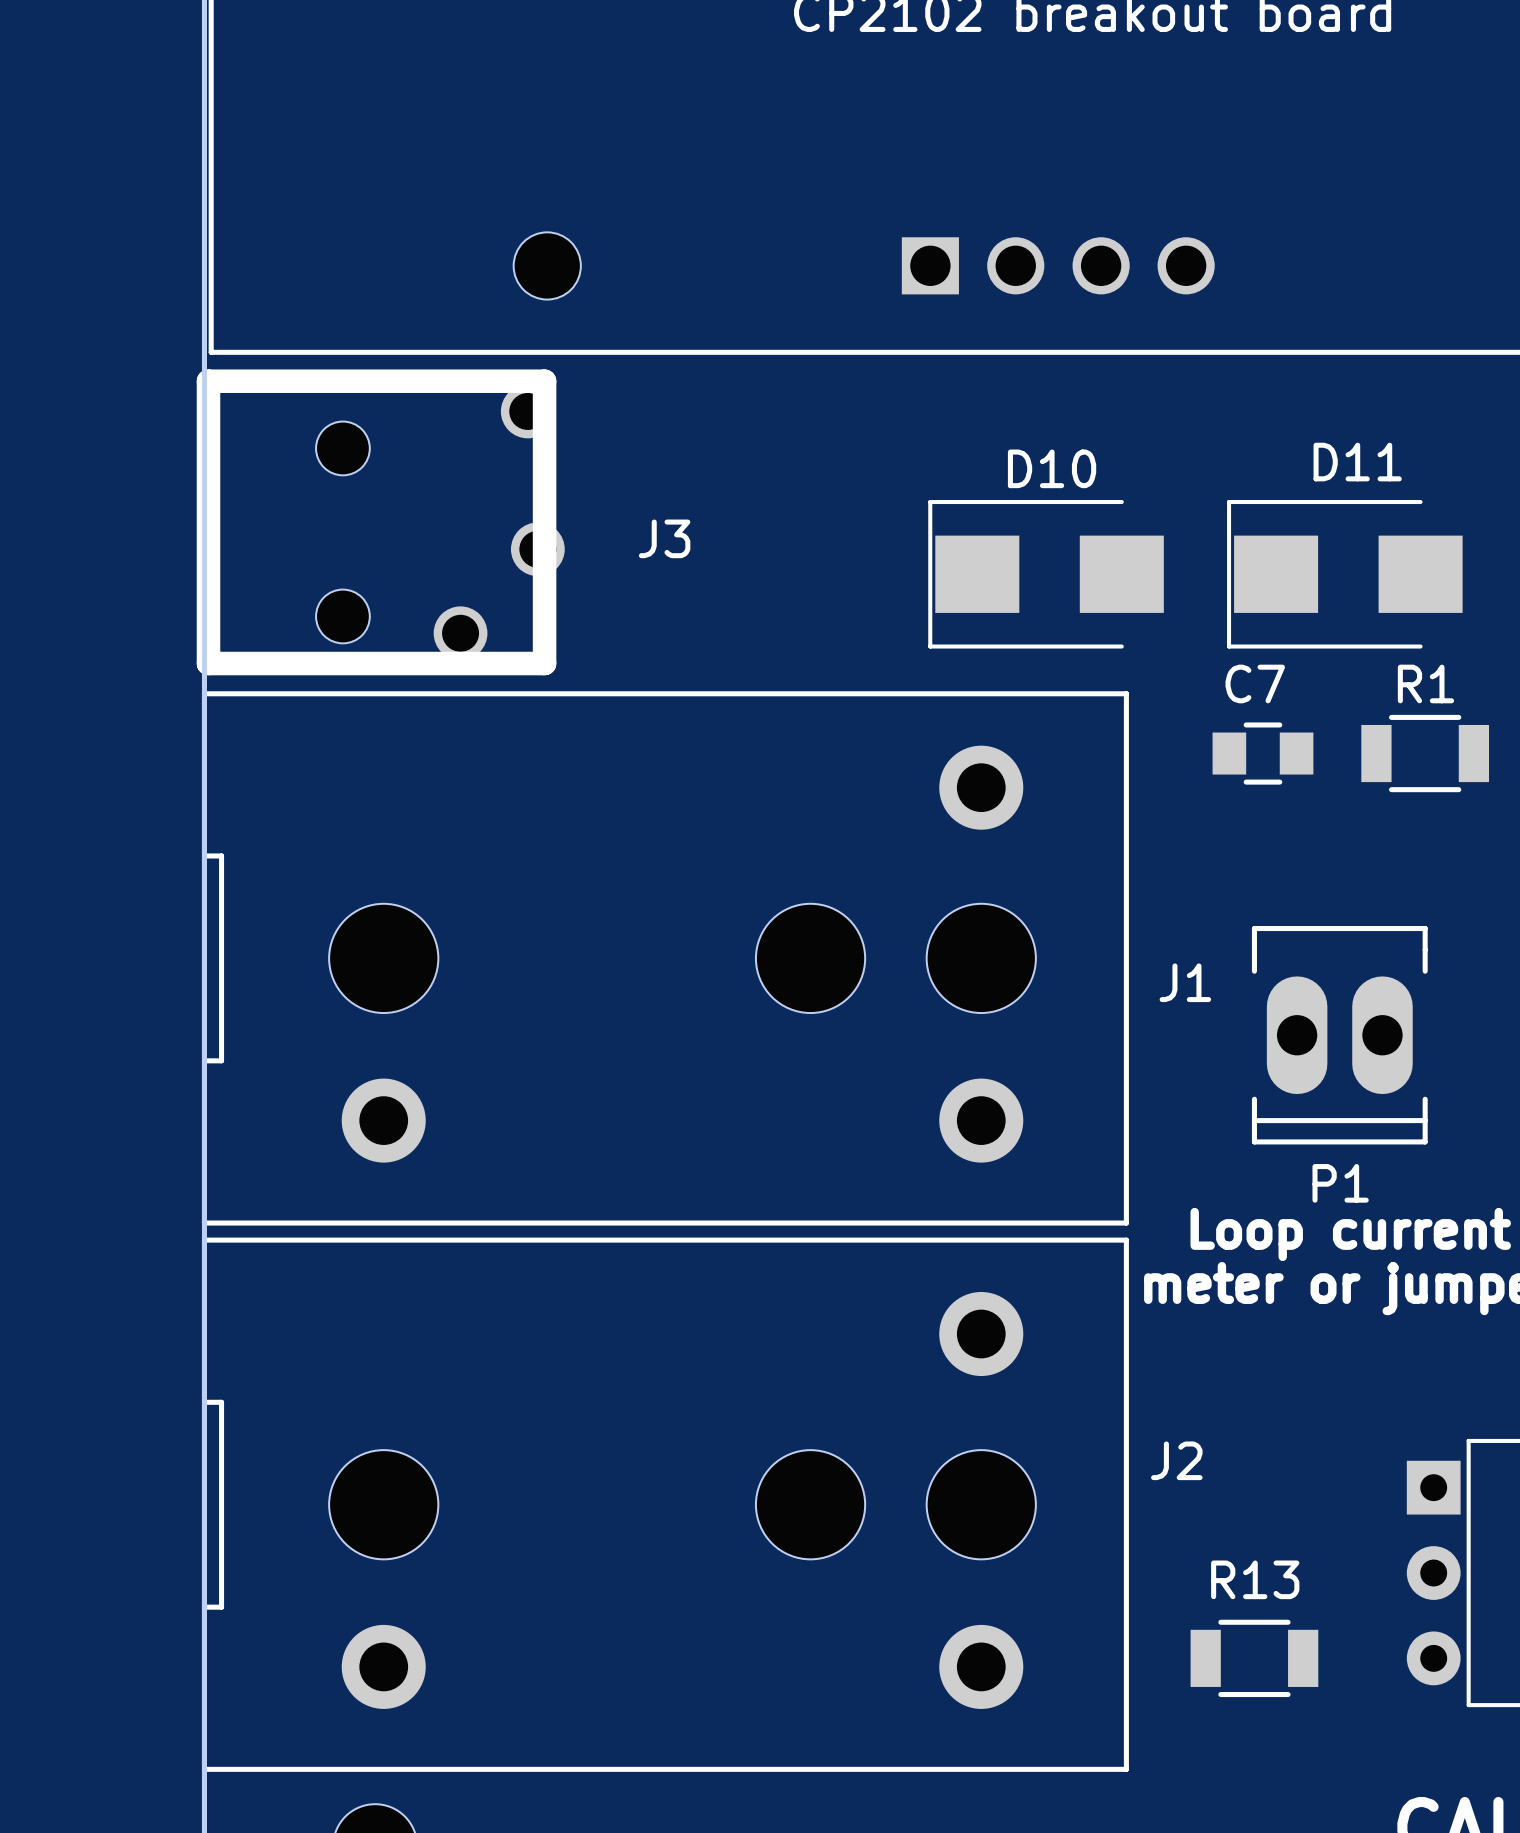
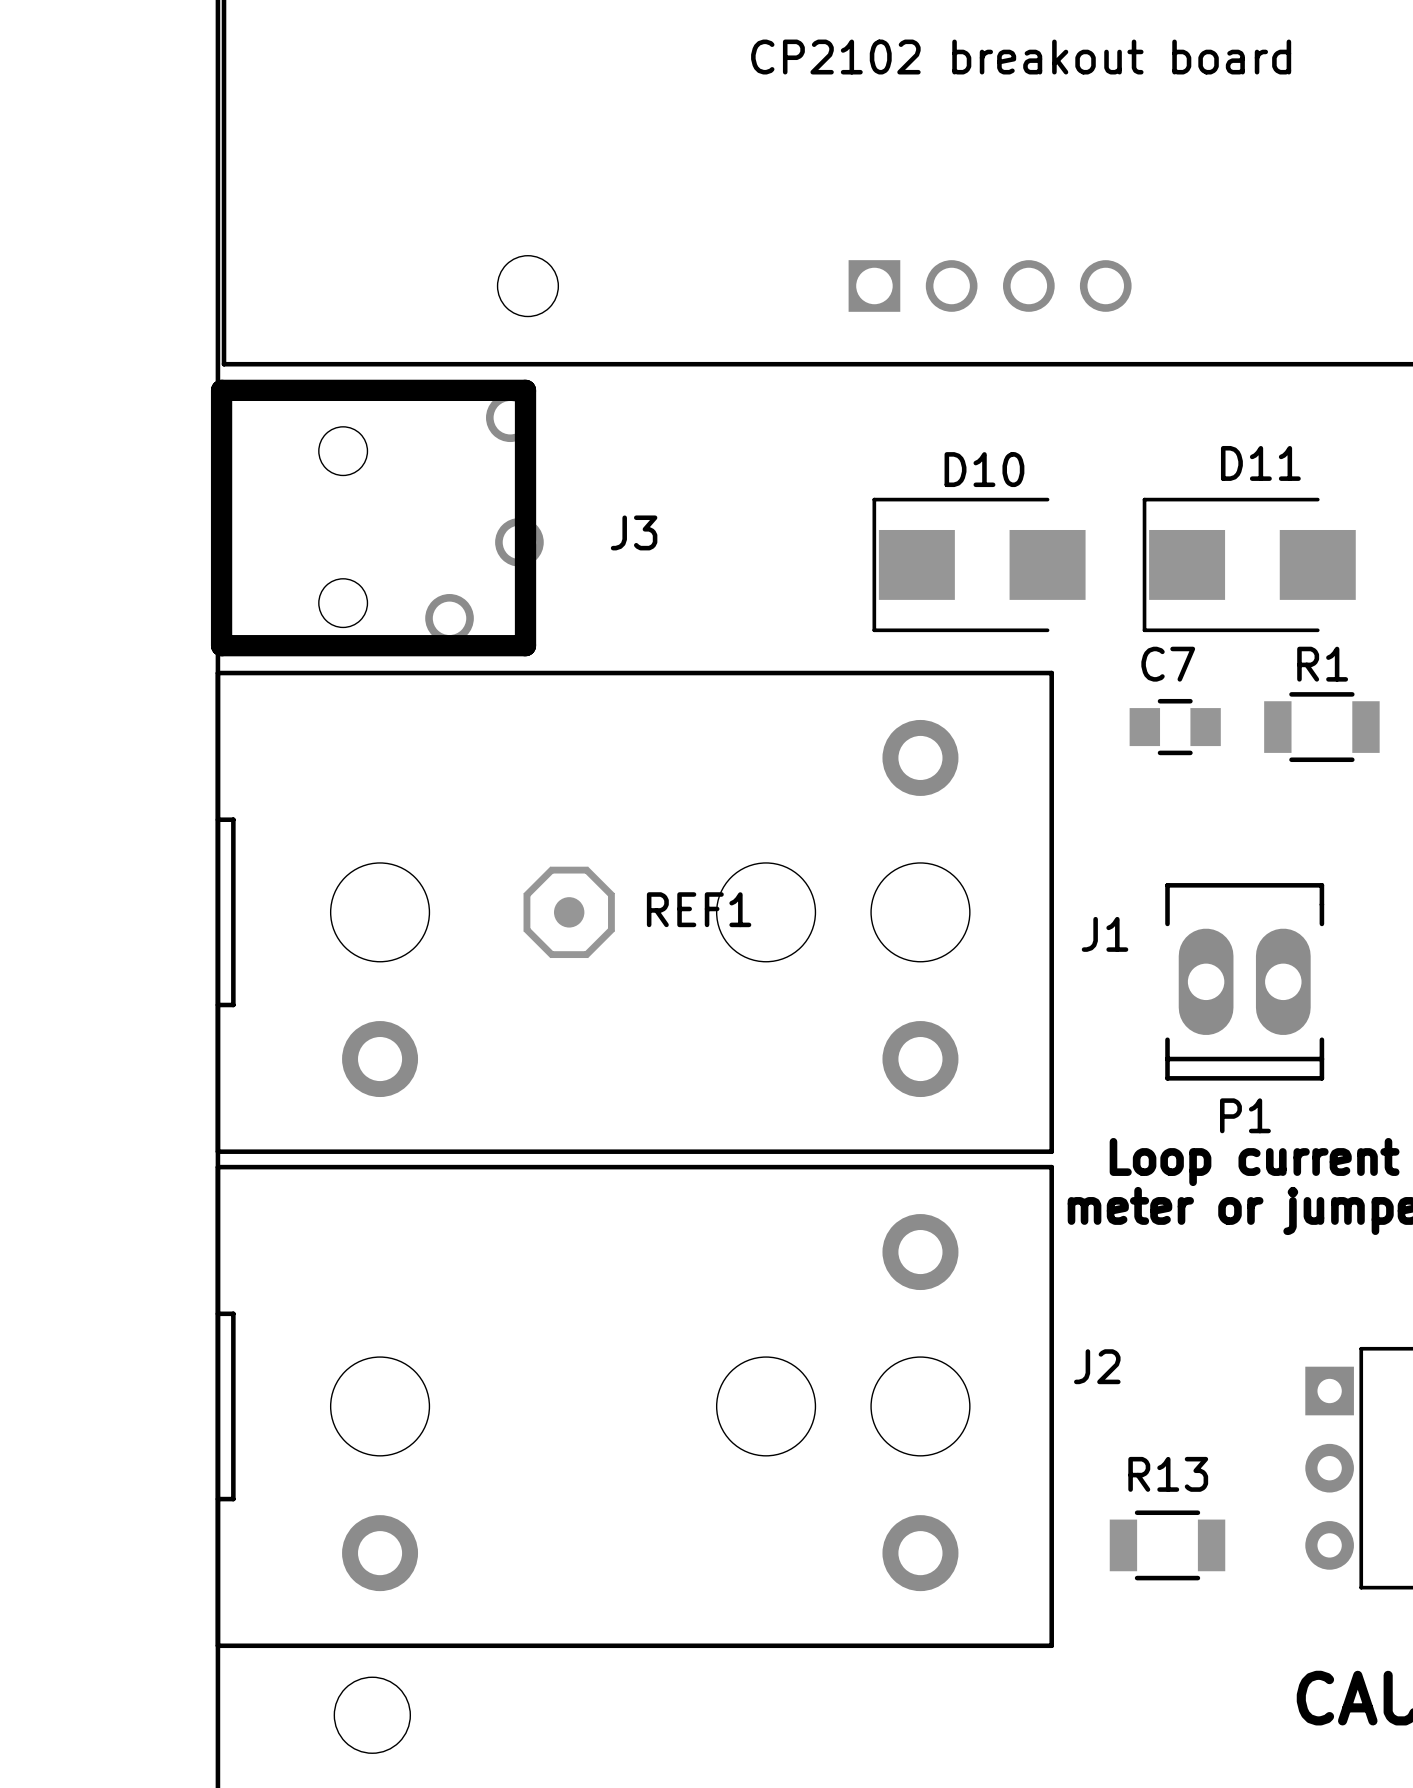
REF1: none -> (569, 912)

